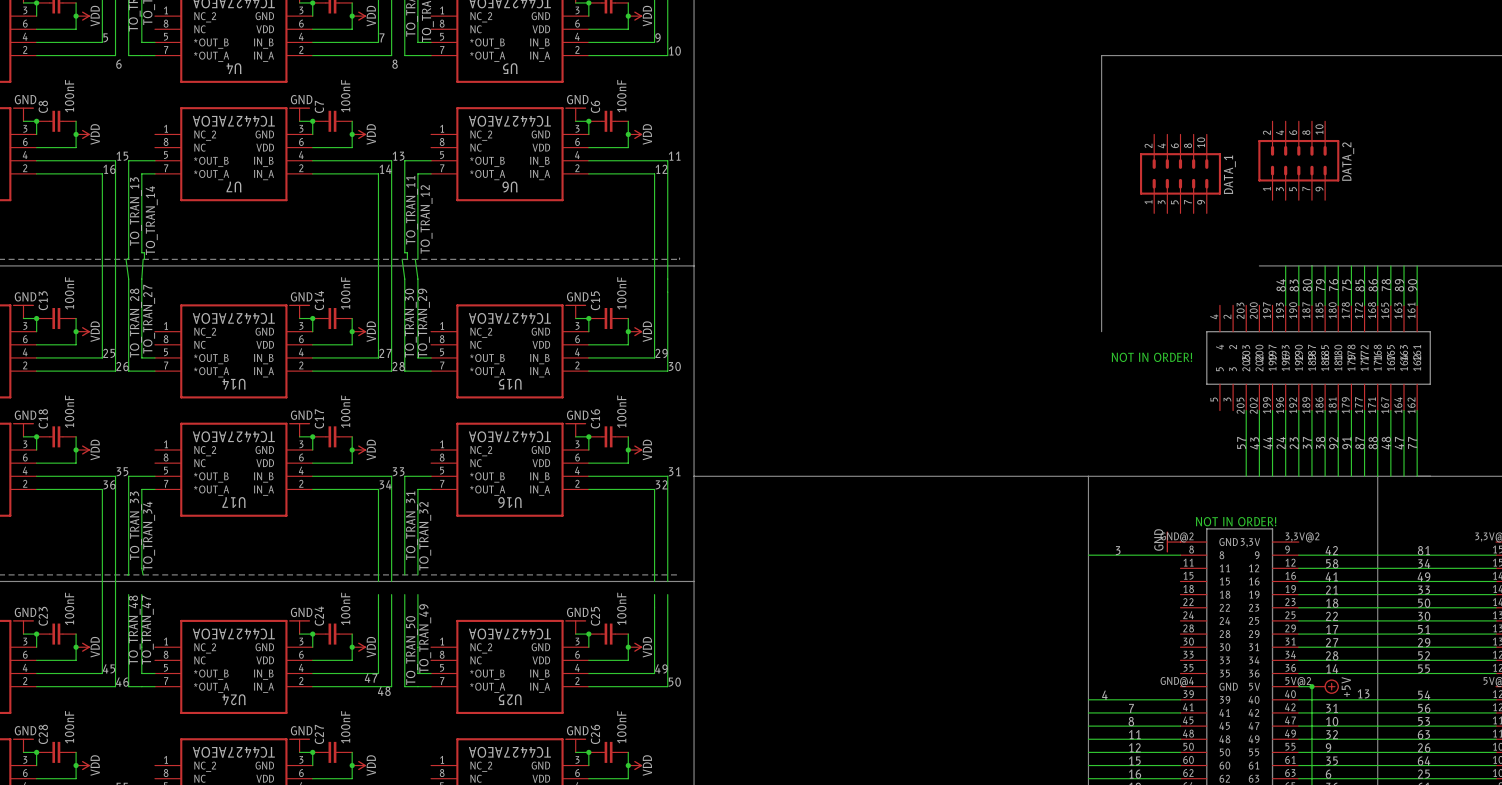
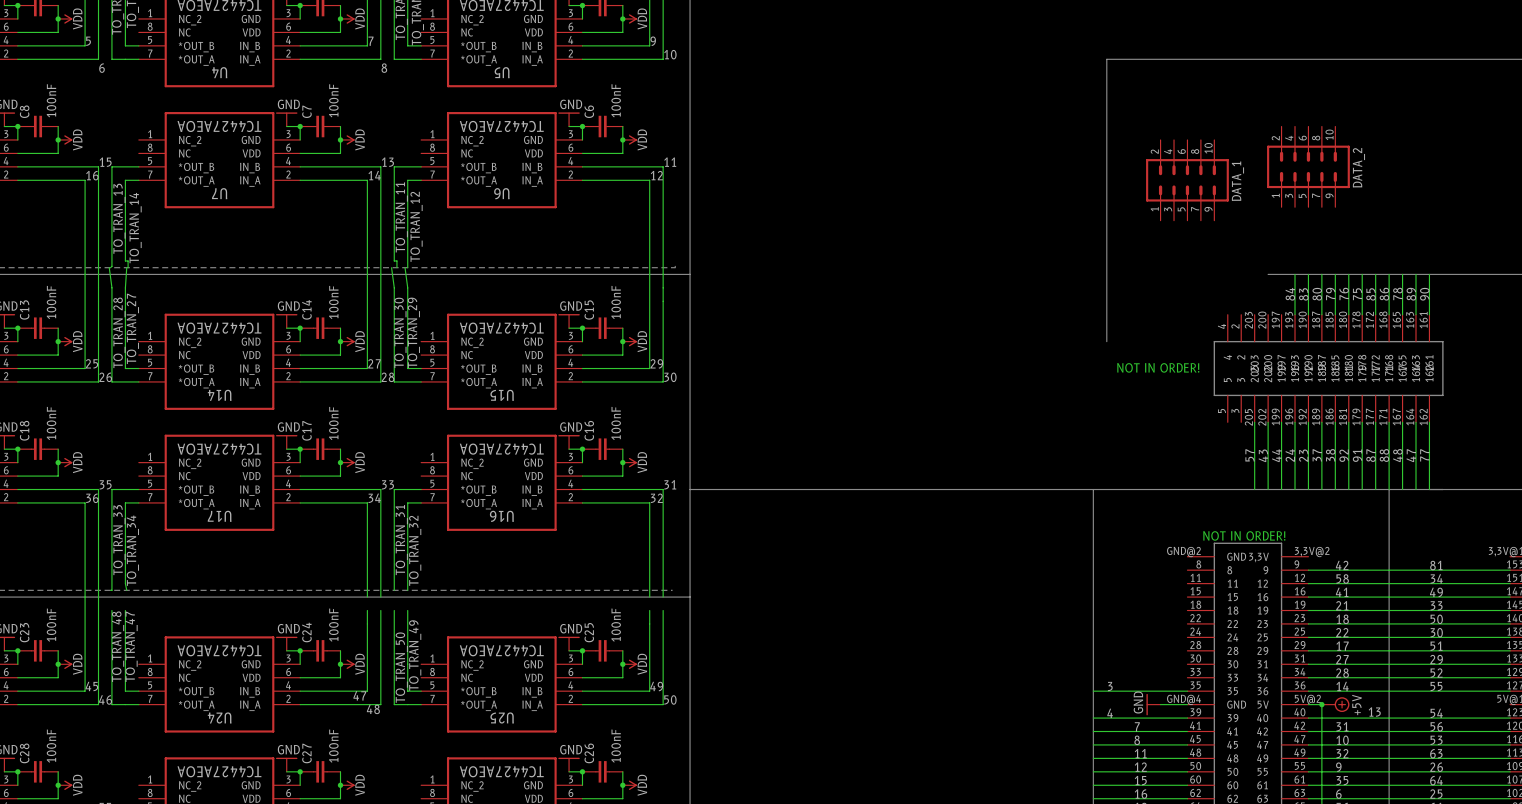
power symbol: GND (1173, 542) -> none
label position: 3 (1118, 550) -> 3 (1110, 686)
wire: (1088, 555) (1180, 555) -> (1093, 691) (1187, 691)
power symbol: none -> GND (1153, 704)
wire: none -> (1160, 704) (1187, 704)

